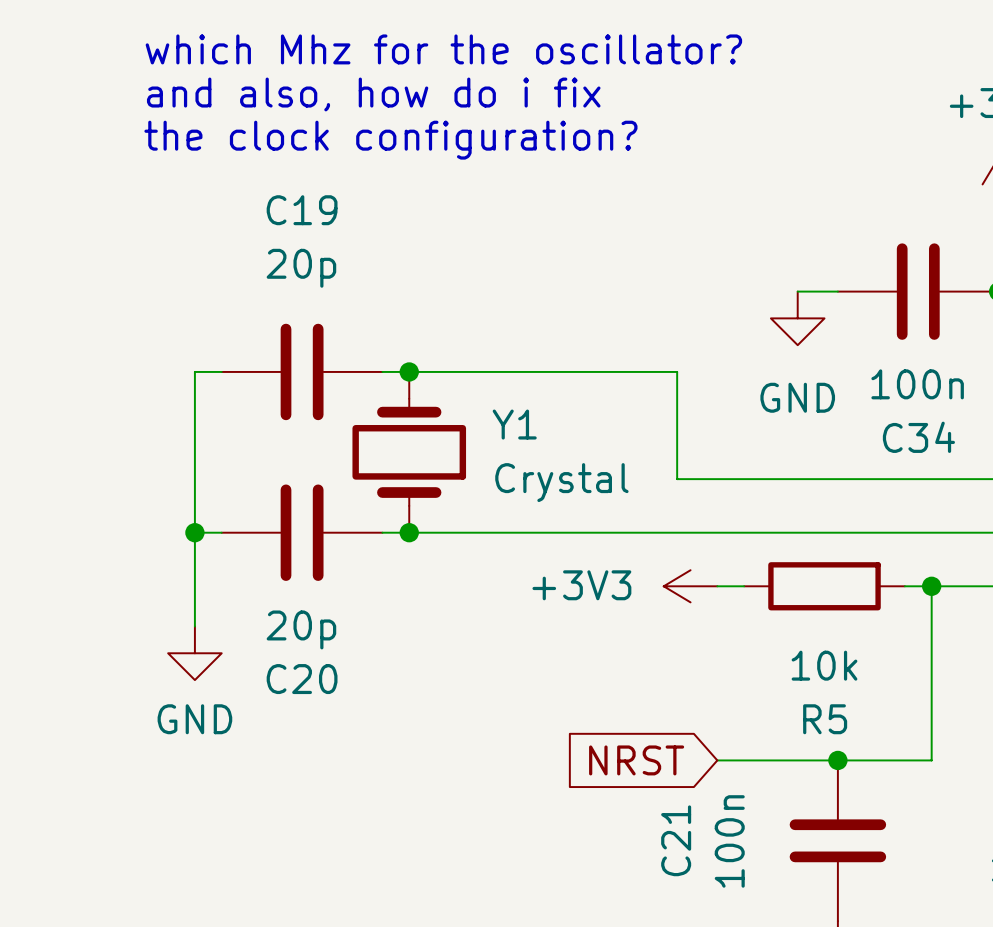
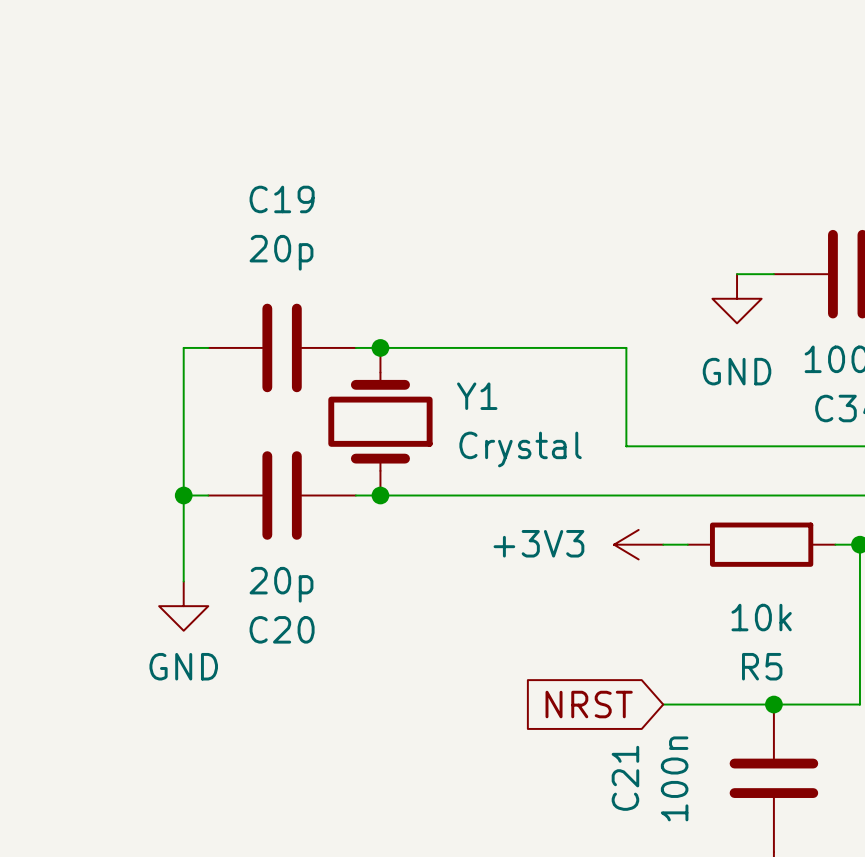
text: which Mhz for the oscillator? (443, 49) -> none
text: and also, how do i fix (373, 94) -> none
text: the clock configuration? (390, 140) -> none

